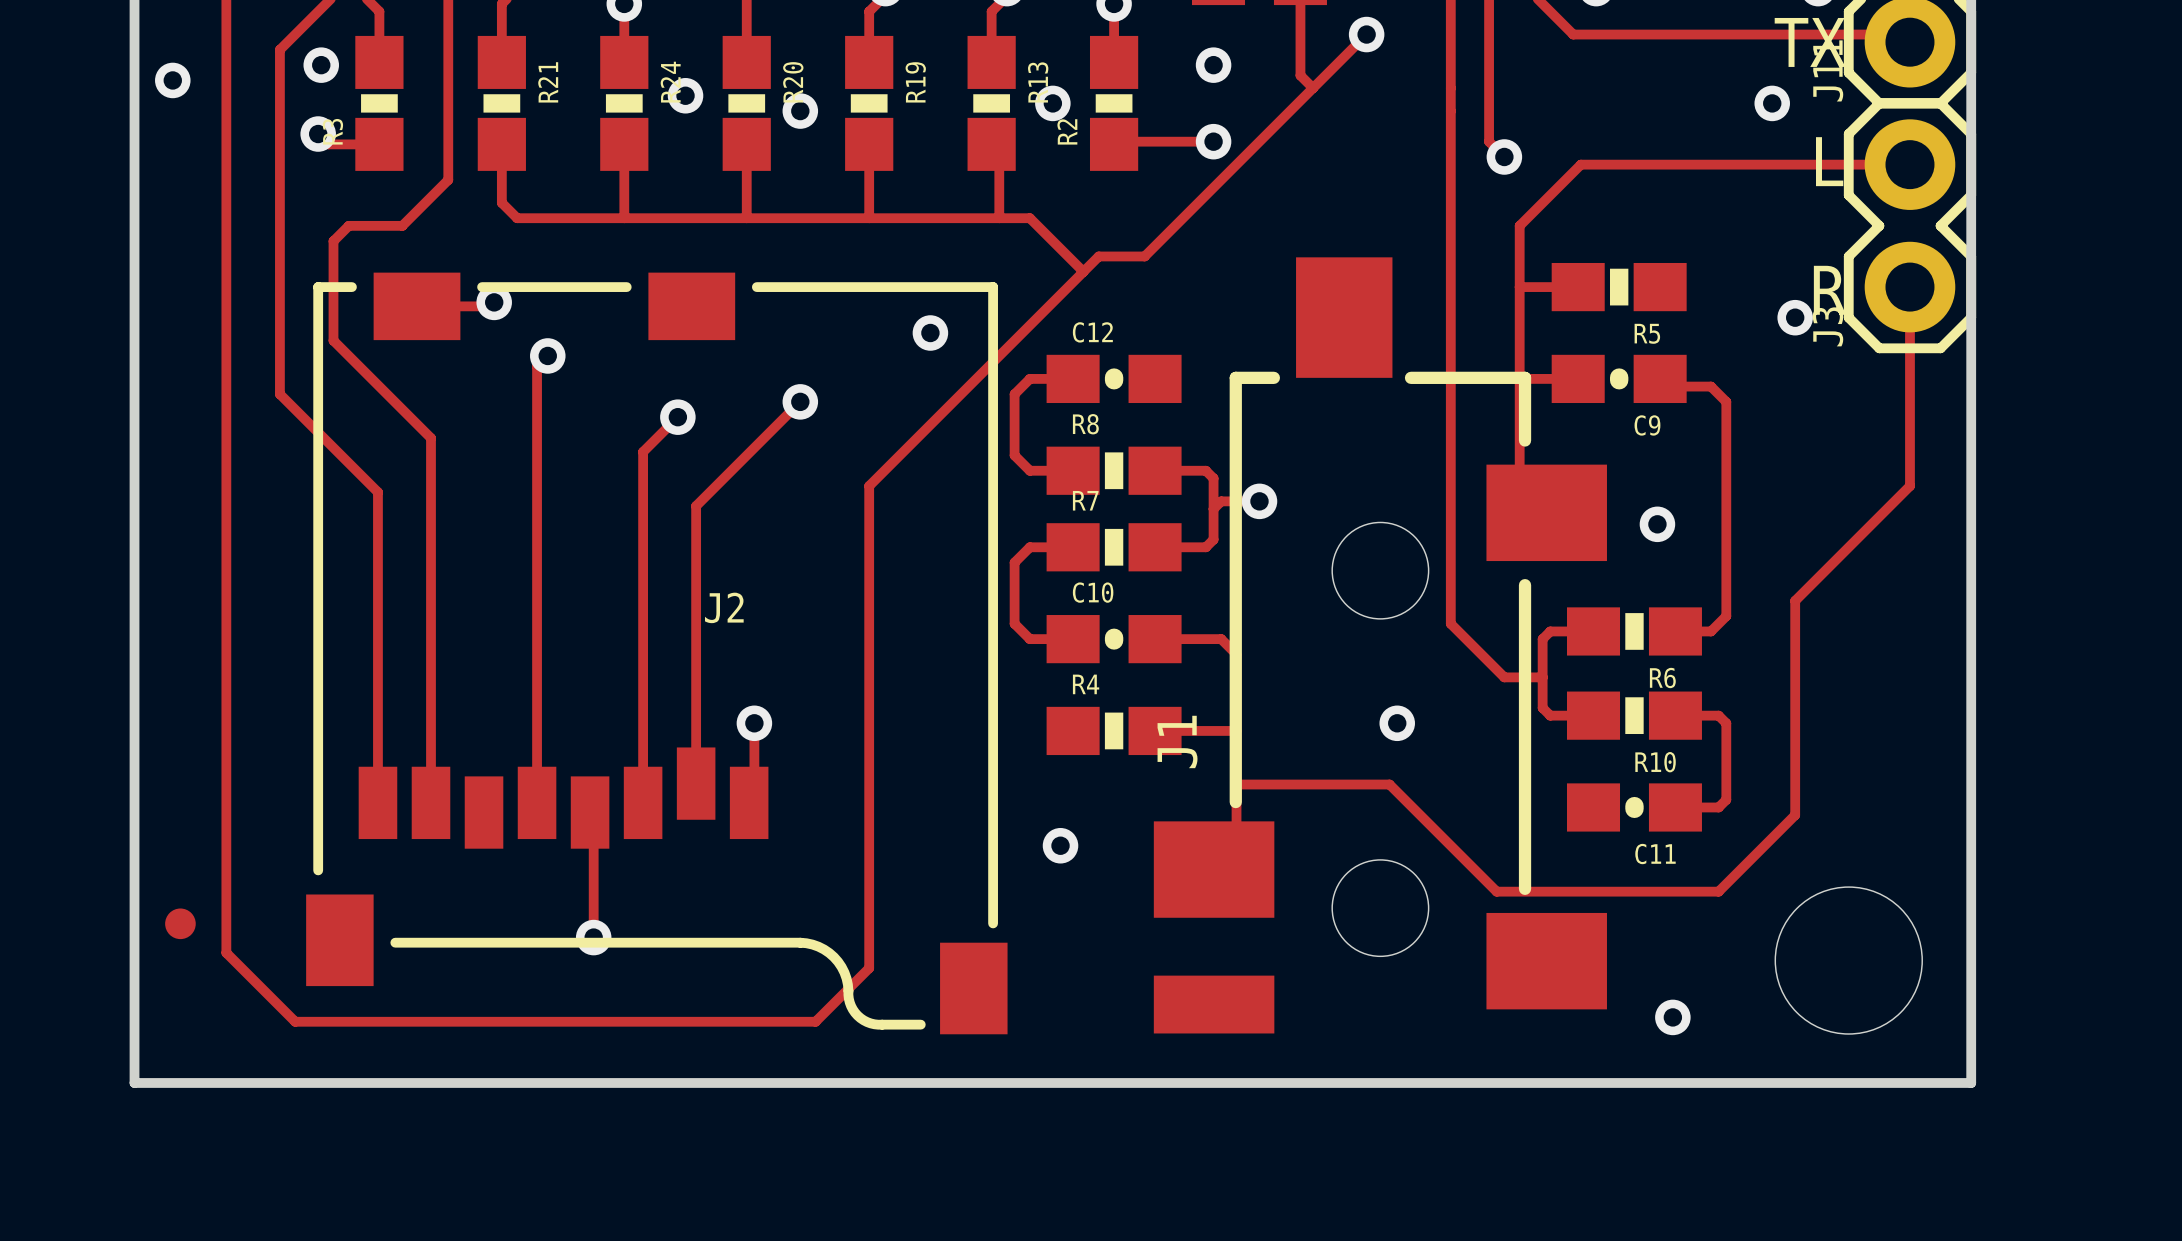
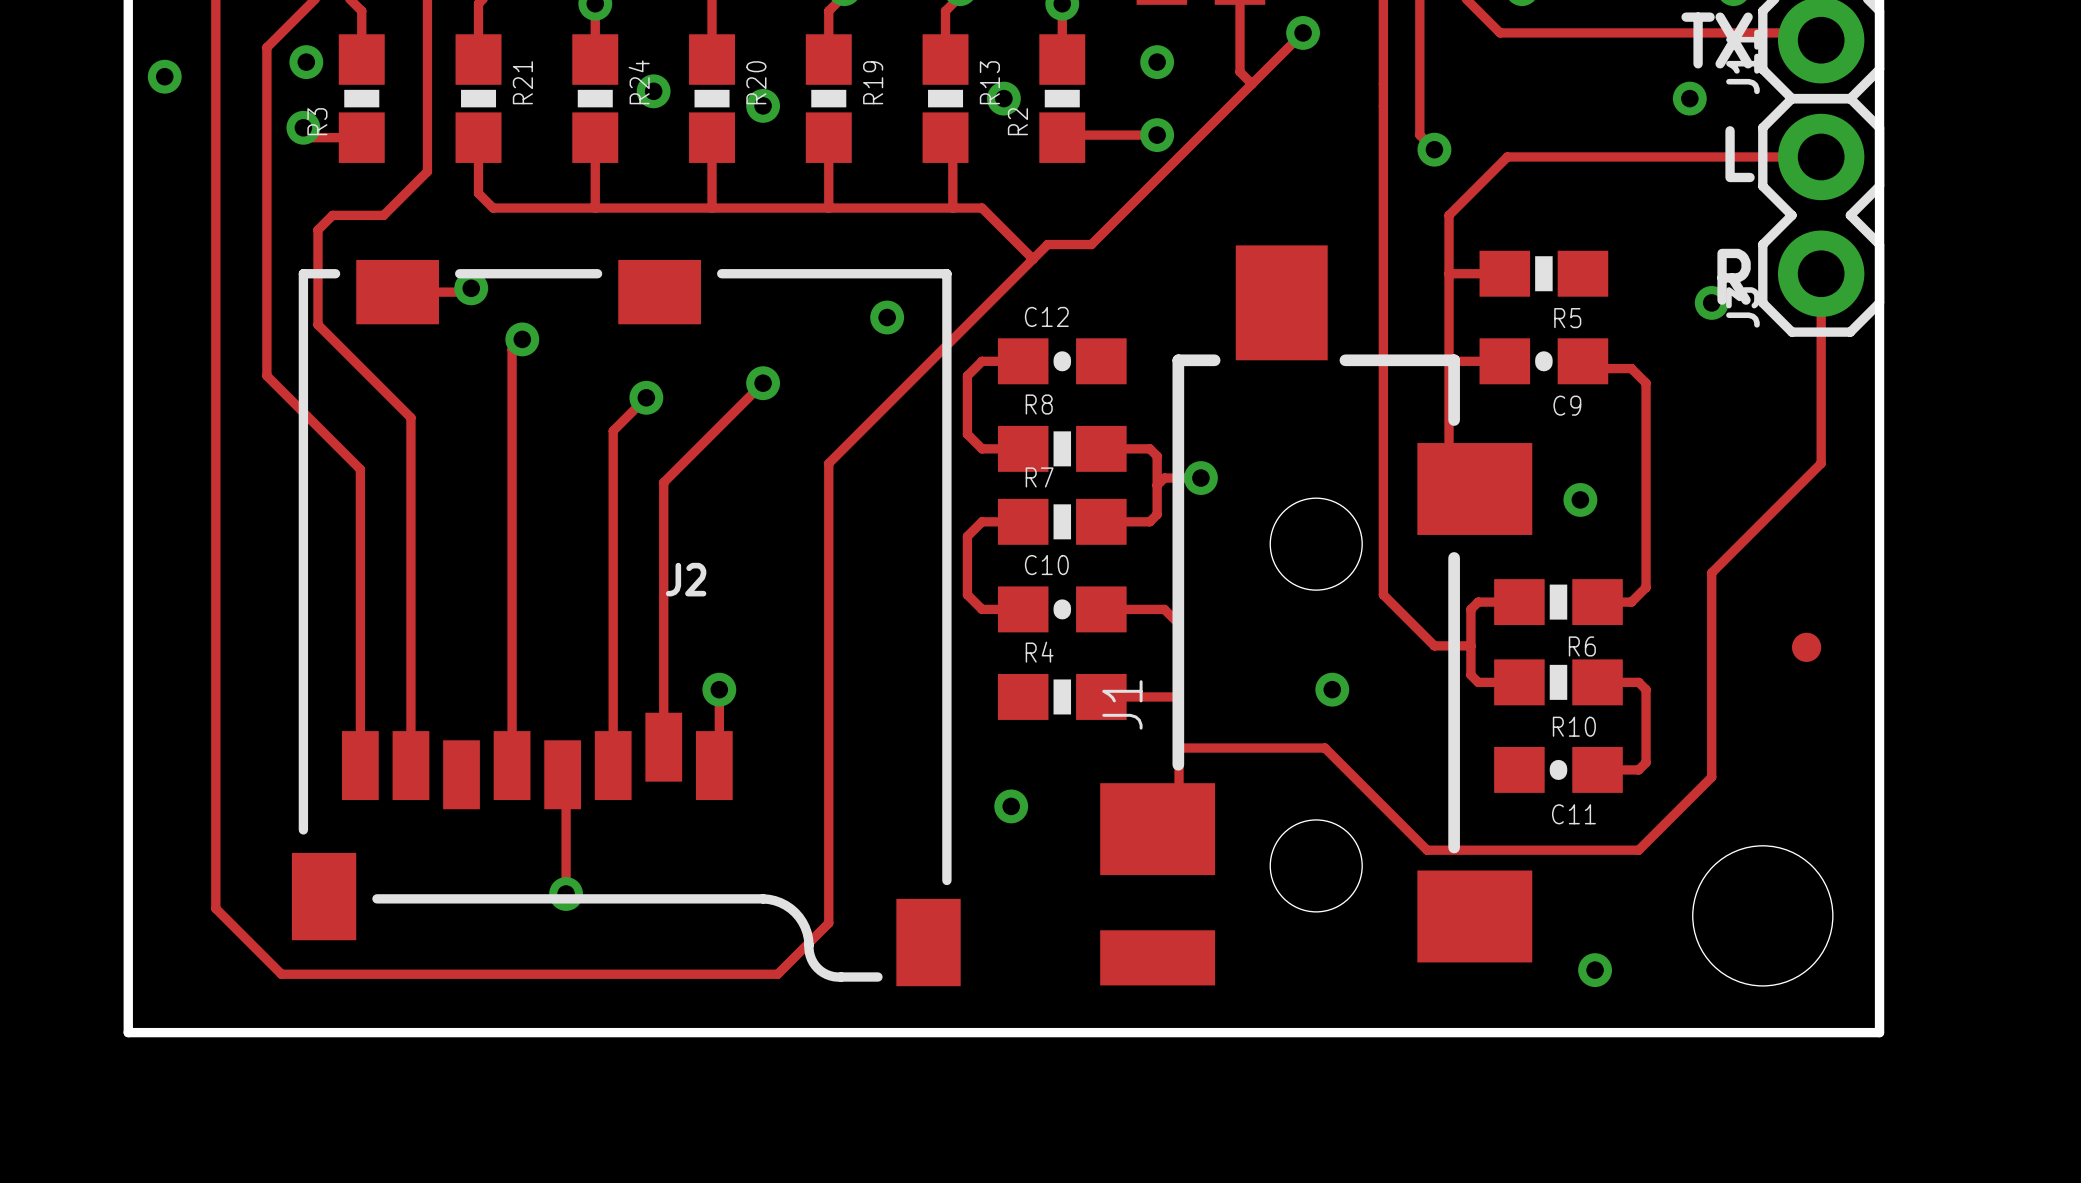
part: none -> (1806, 647)
part: (180, 923) -> none

